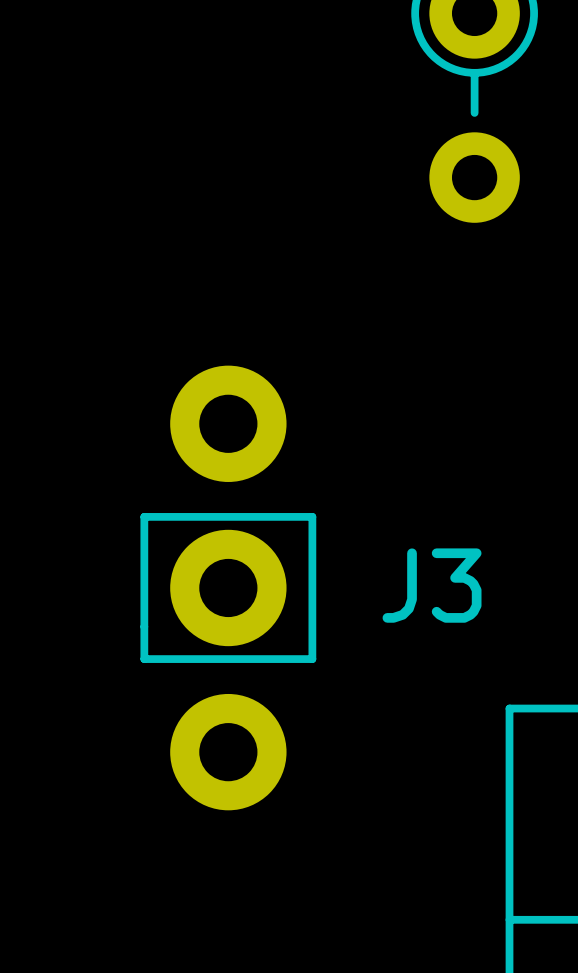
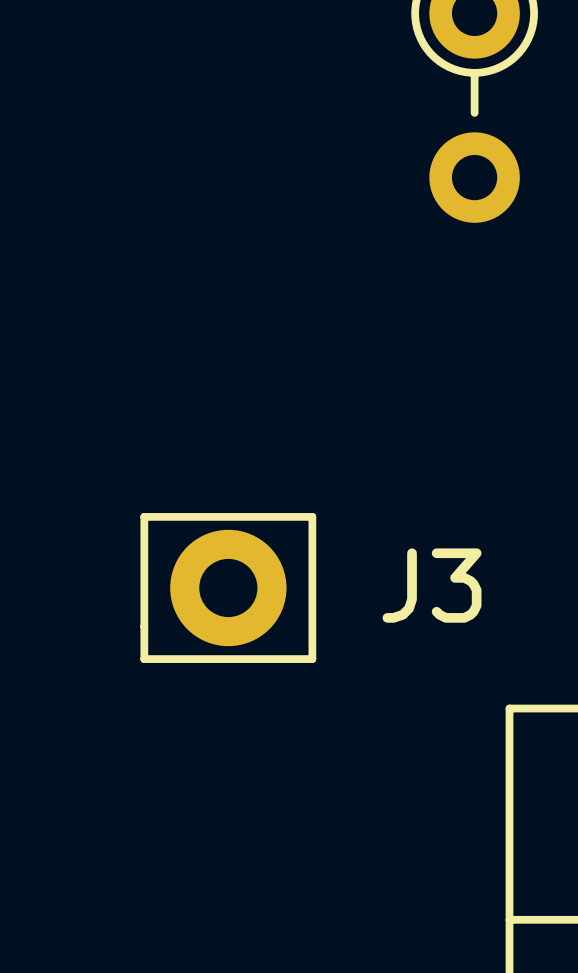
part: (228, 423) -> none
part: (228, 752) -> none

